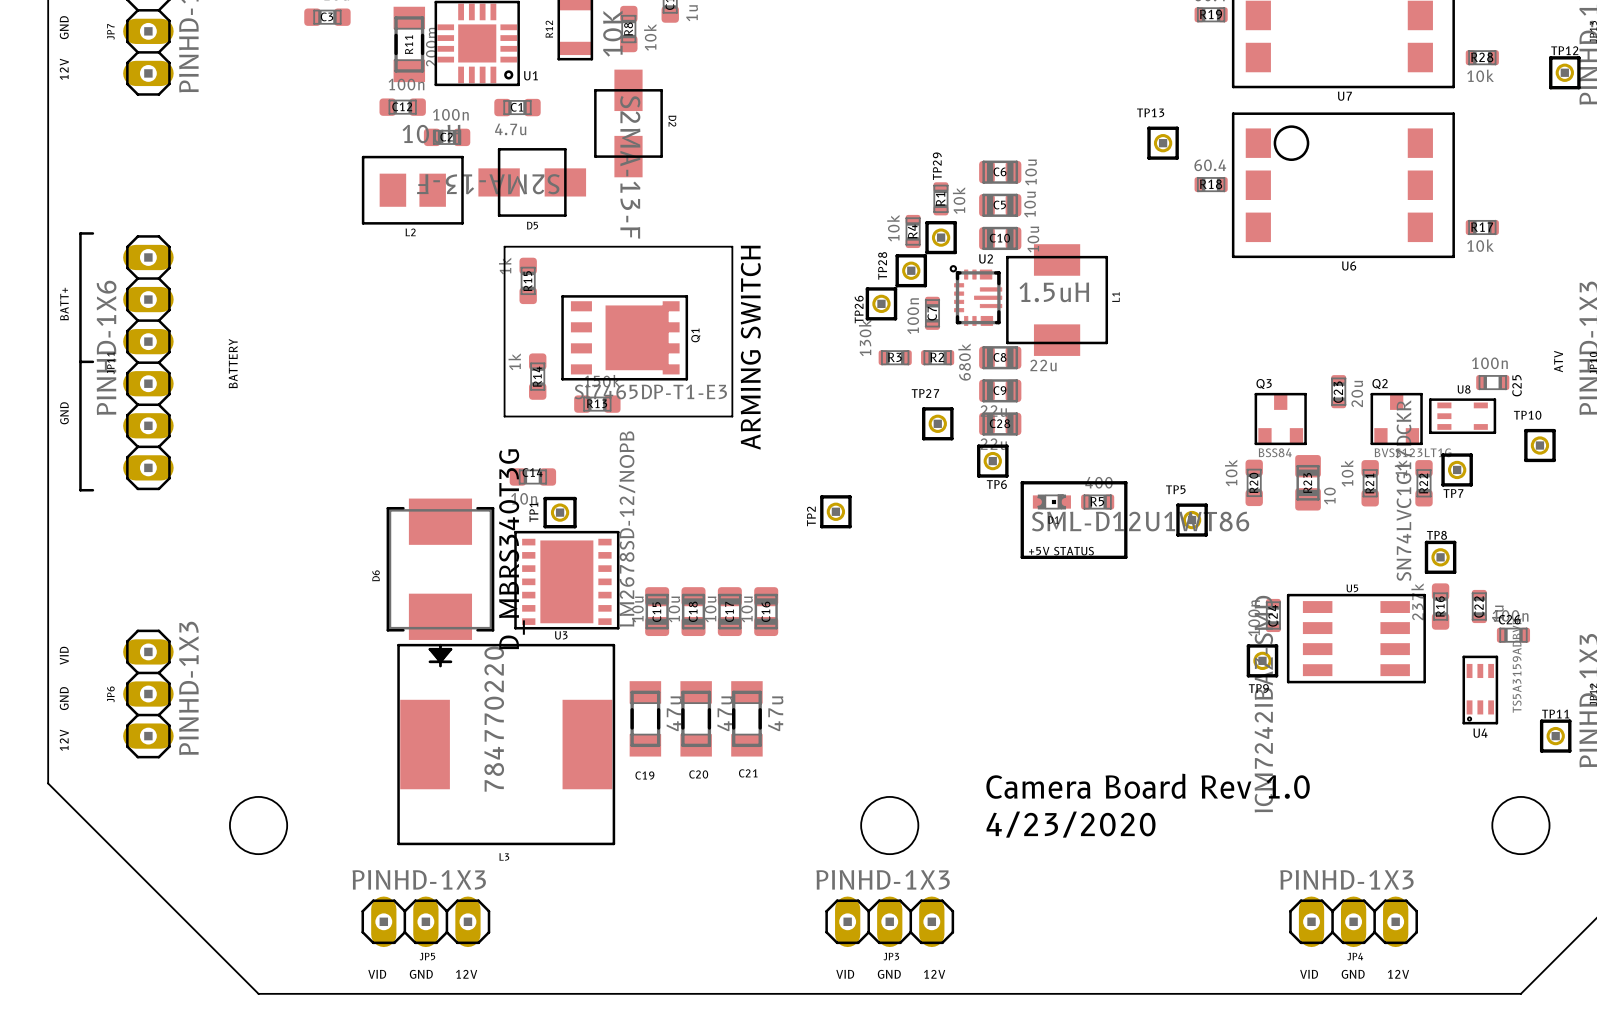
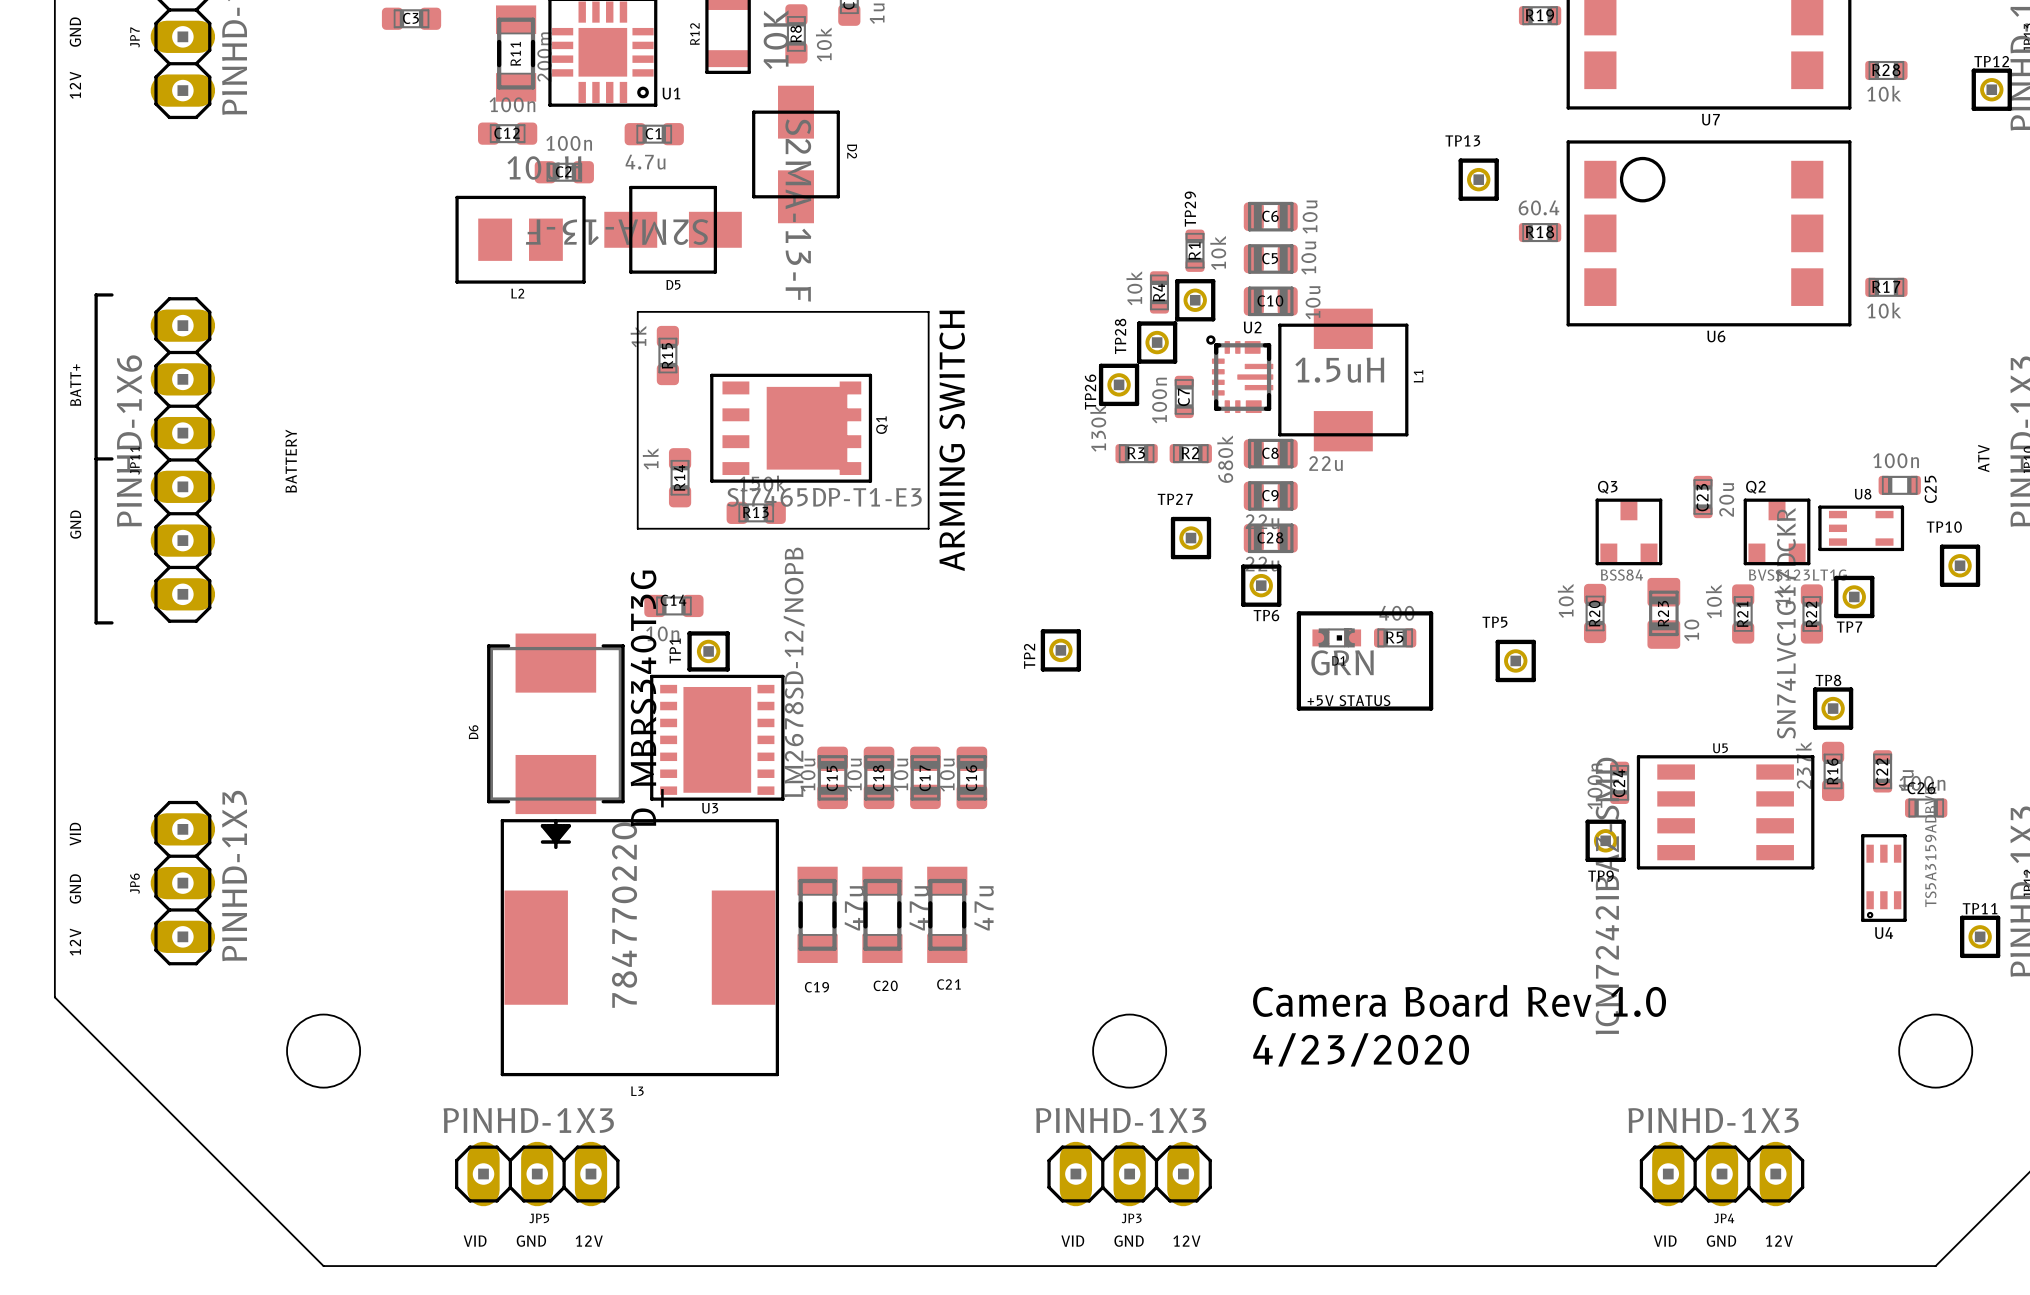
D1 value: SML-D12U1WT86 (1140, 521) -> GRN (1342, 662)

